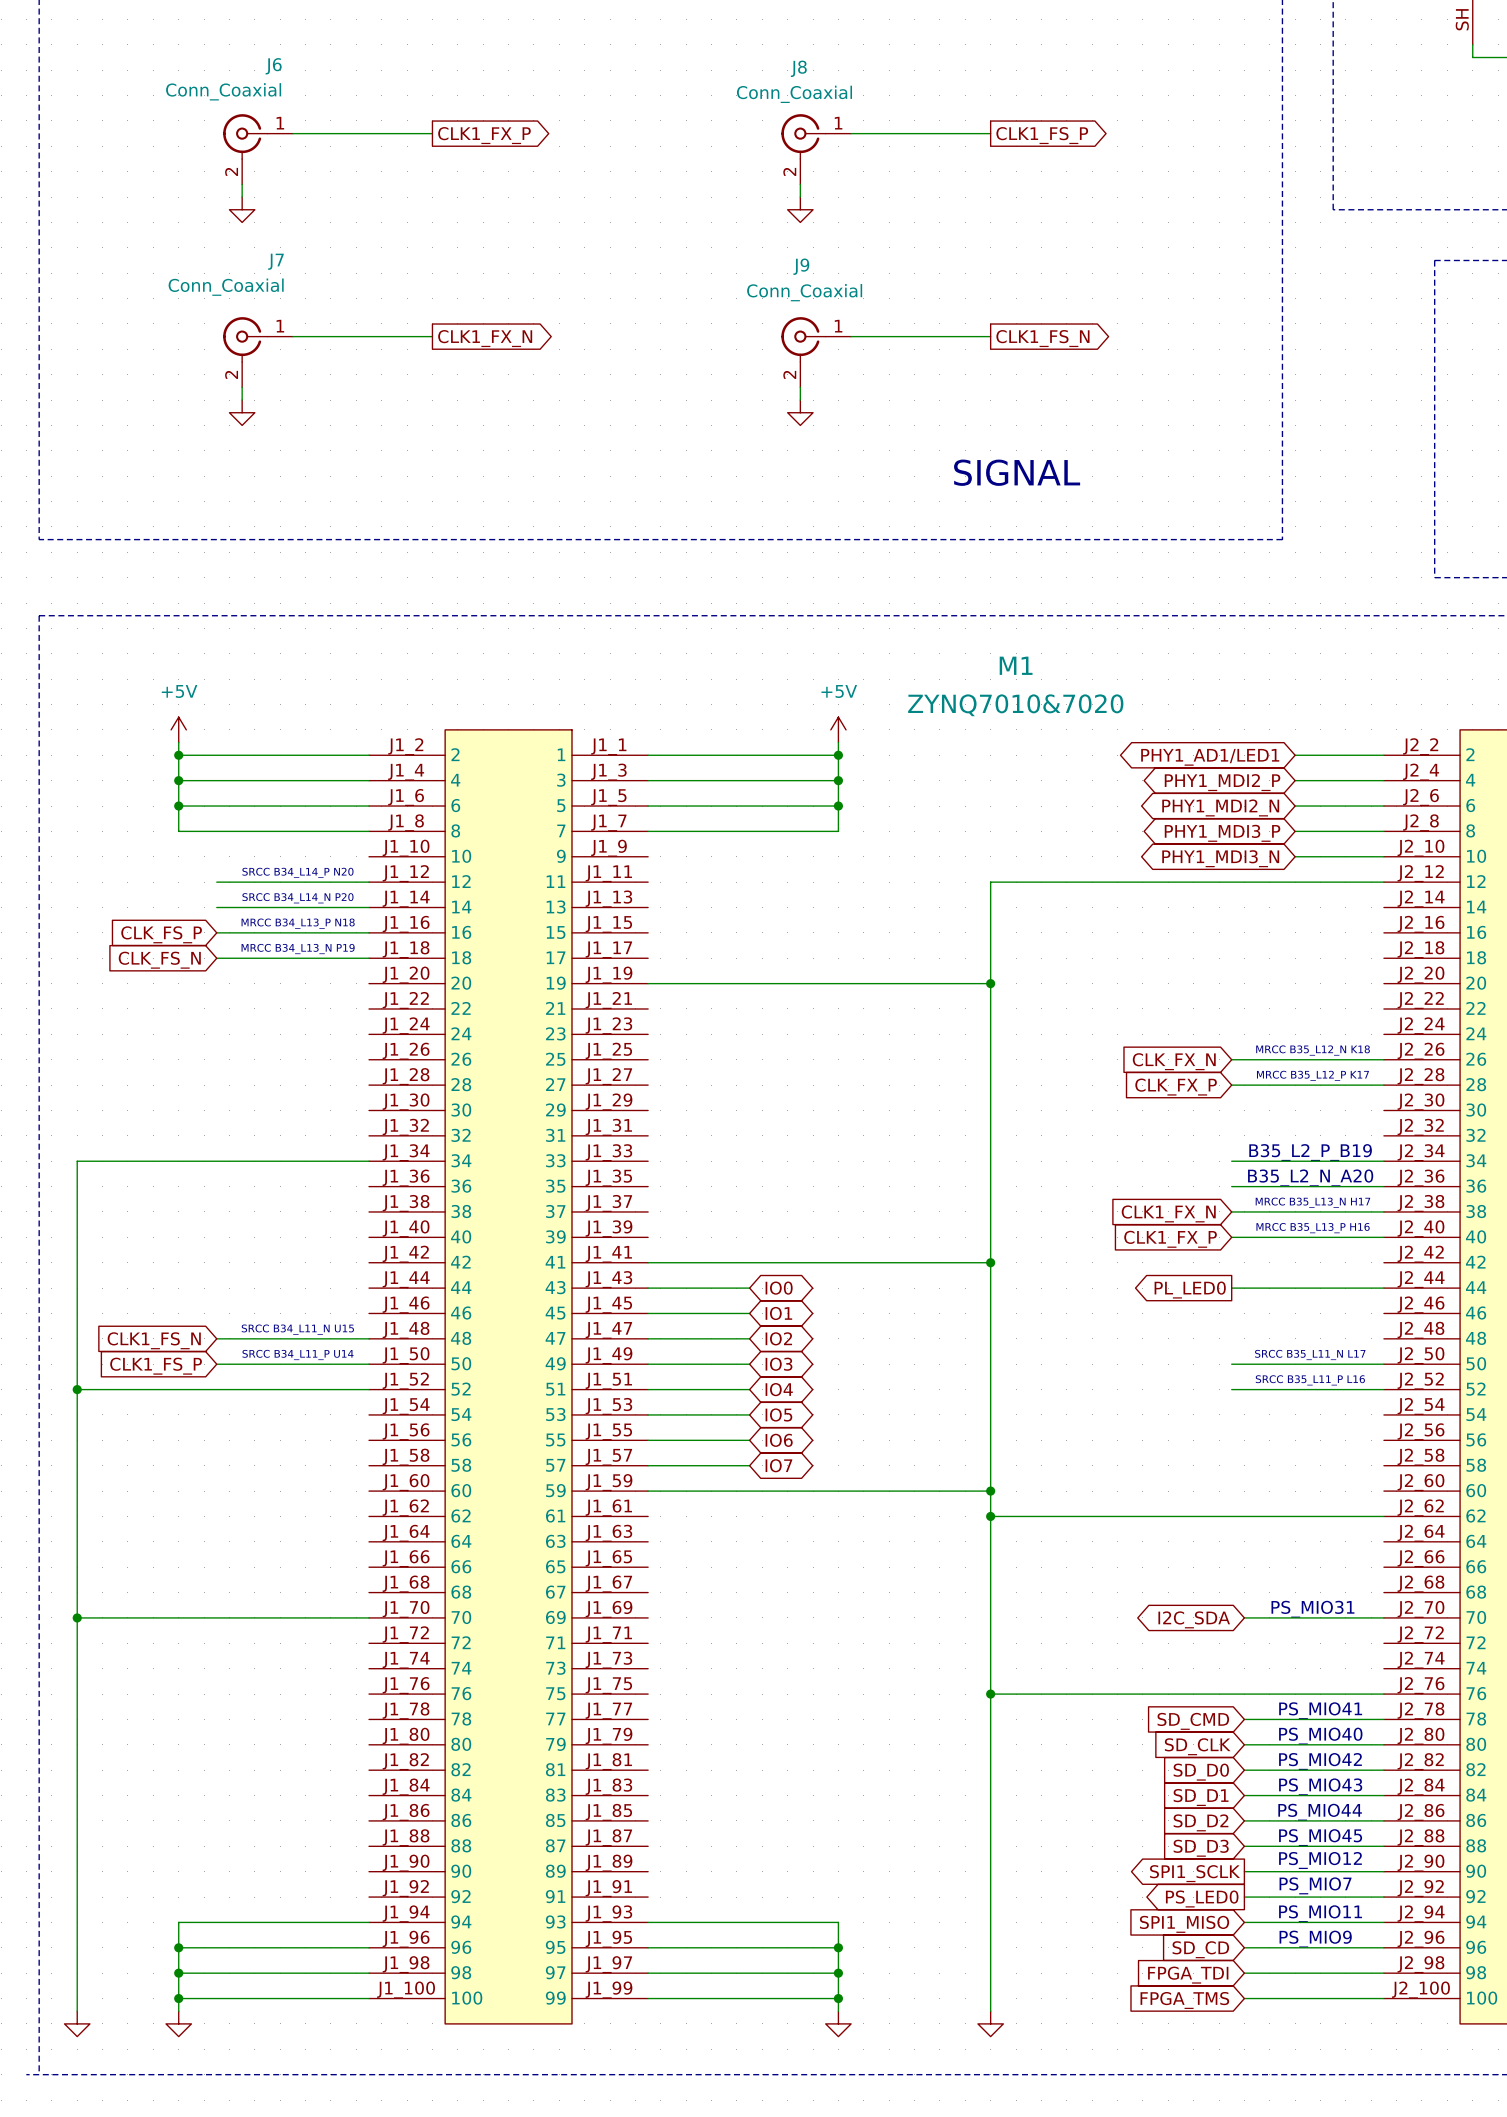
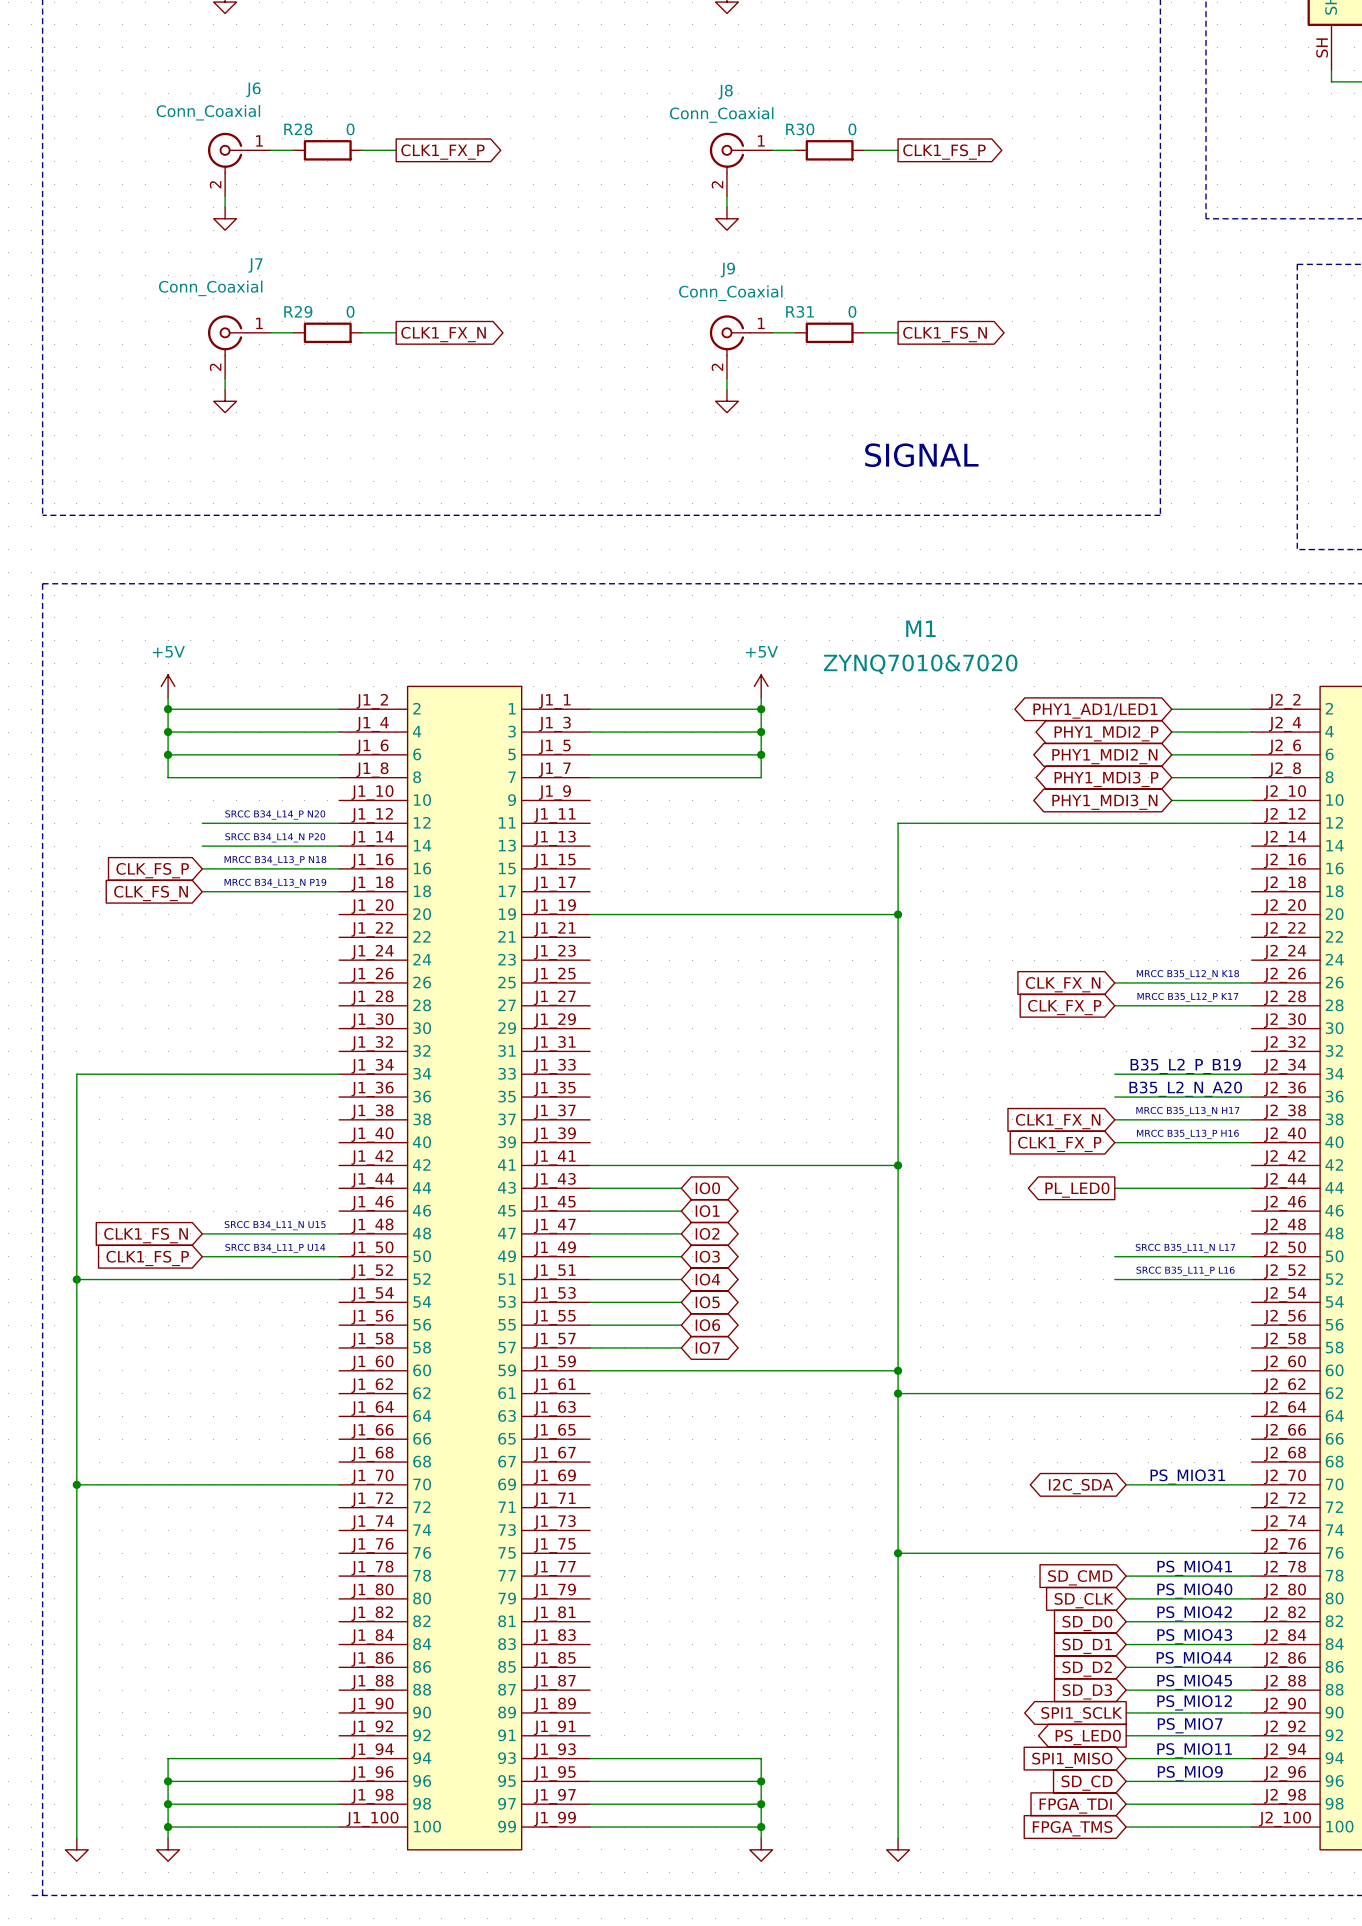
wire: (318, 133) (394, 133) -> none
R28: none -> 0 (327, 150)
wire: (876, 133) (952, 133) -> none
R30: none -> 0 (829, 150)
wire: (318, 336) (394, 336) -> none
R29: none -> 0 (327, 332)
wire: (876, 336) (952, 336) -> none
R31: none -> 0 (829, 332)

